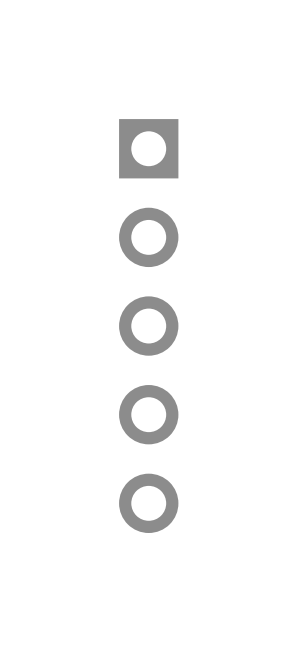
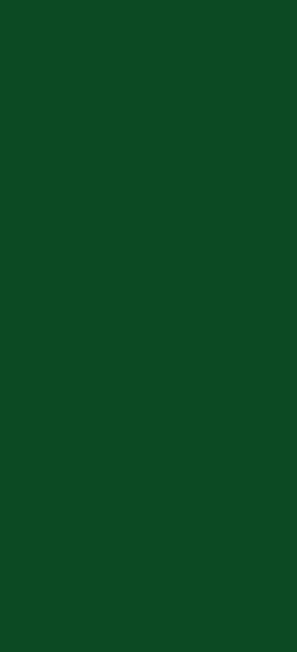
part: (148, 326) -> none

